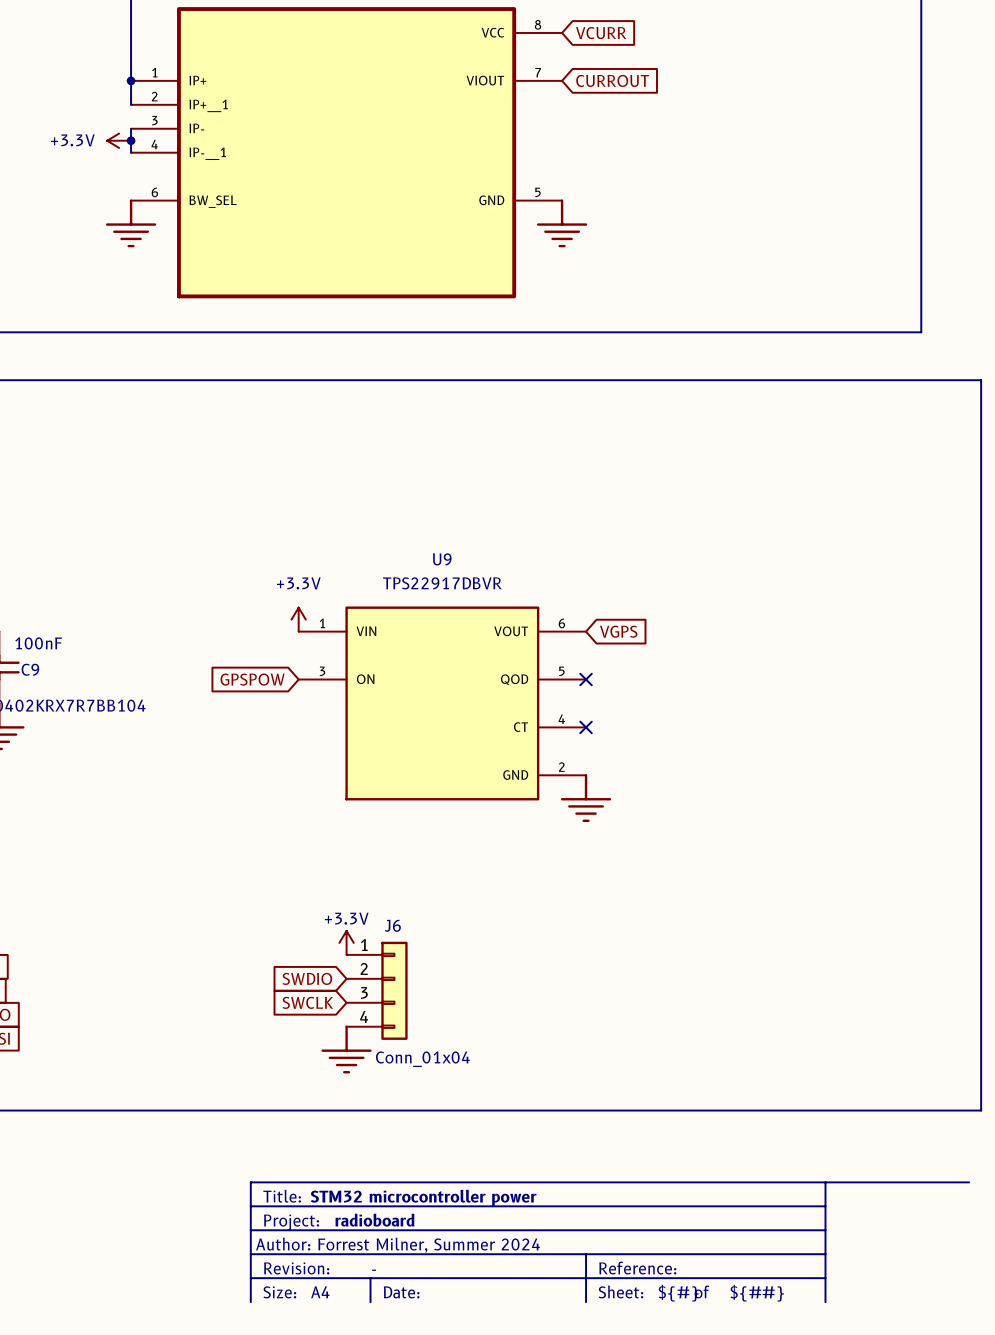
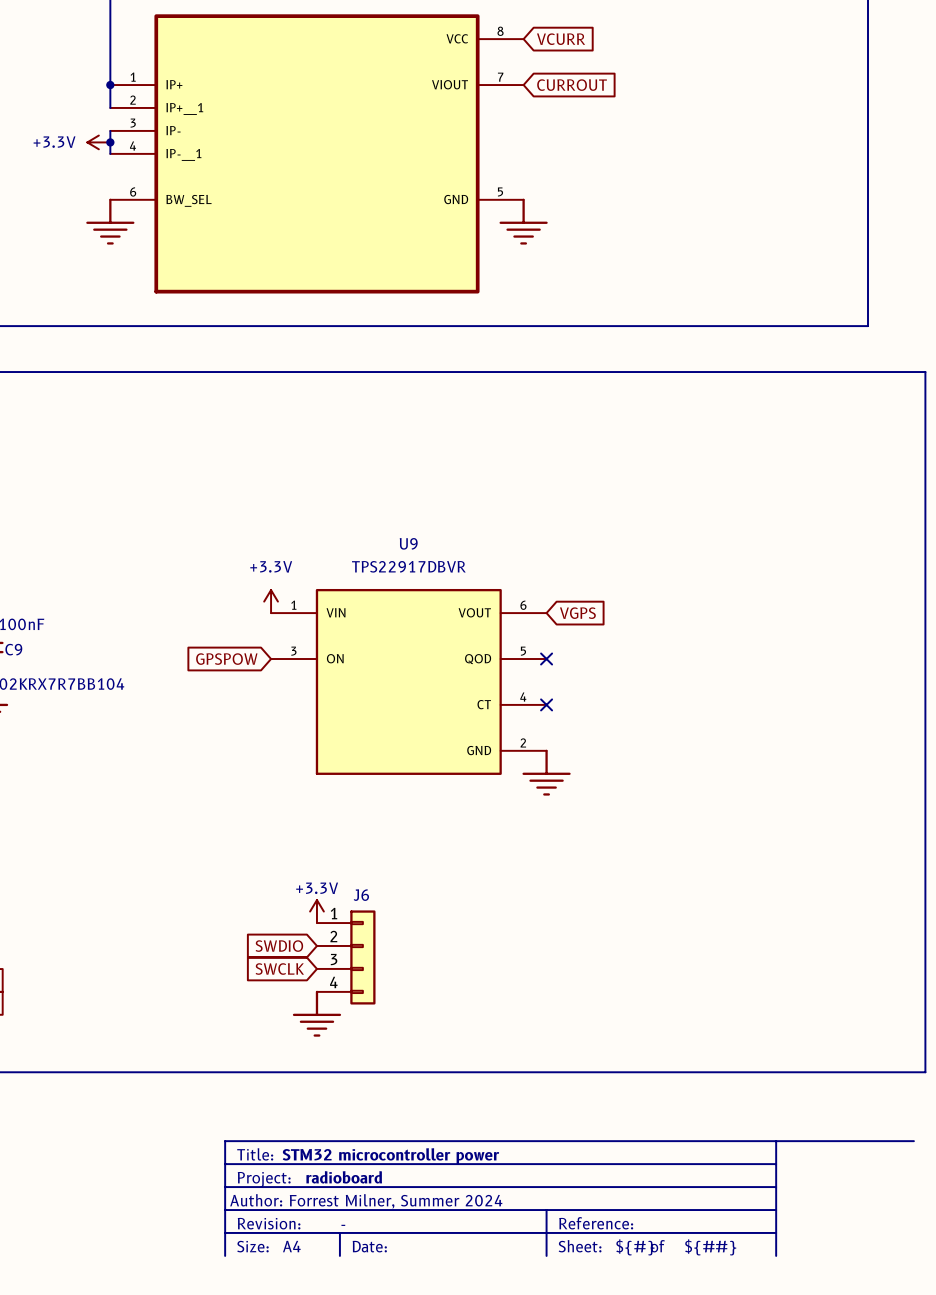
J6 value: Conn_01x04 (422, 1059) -> none

